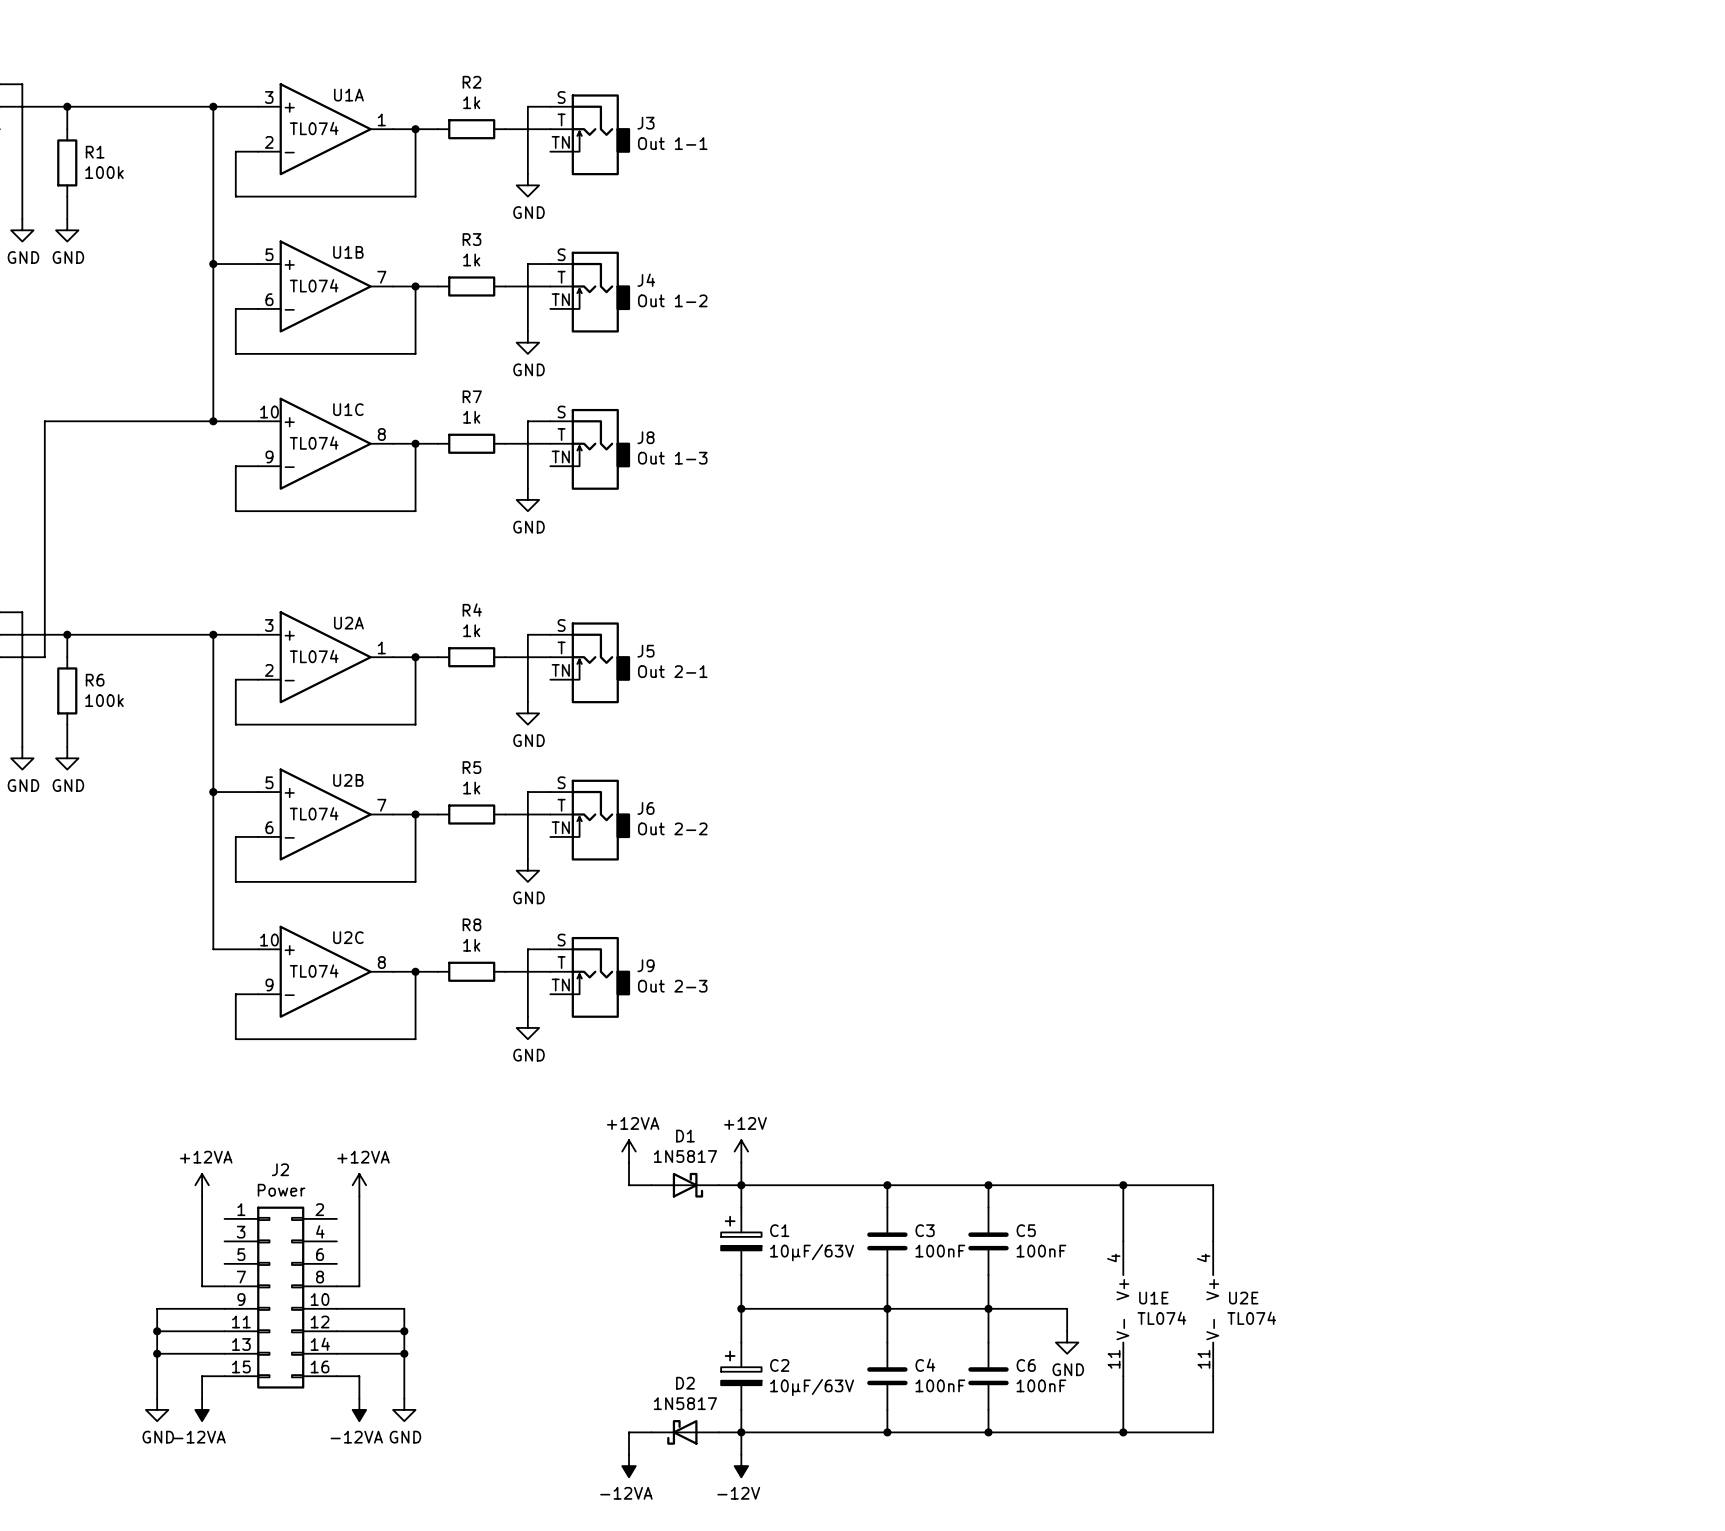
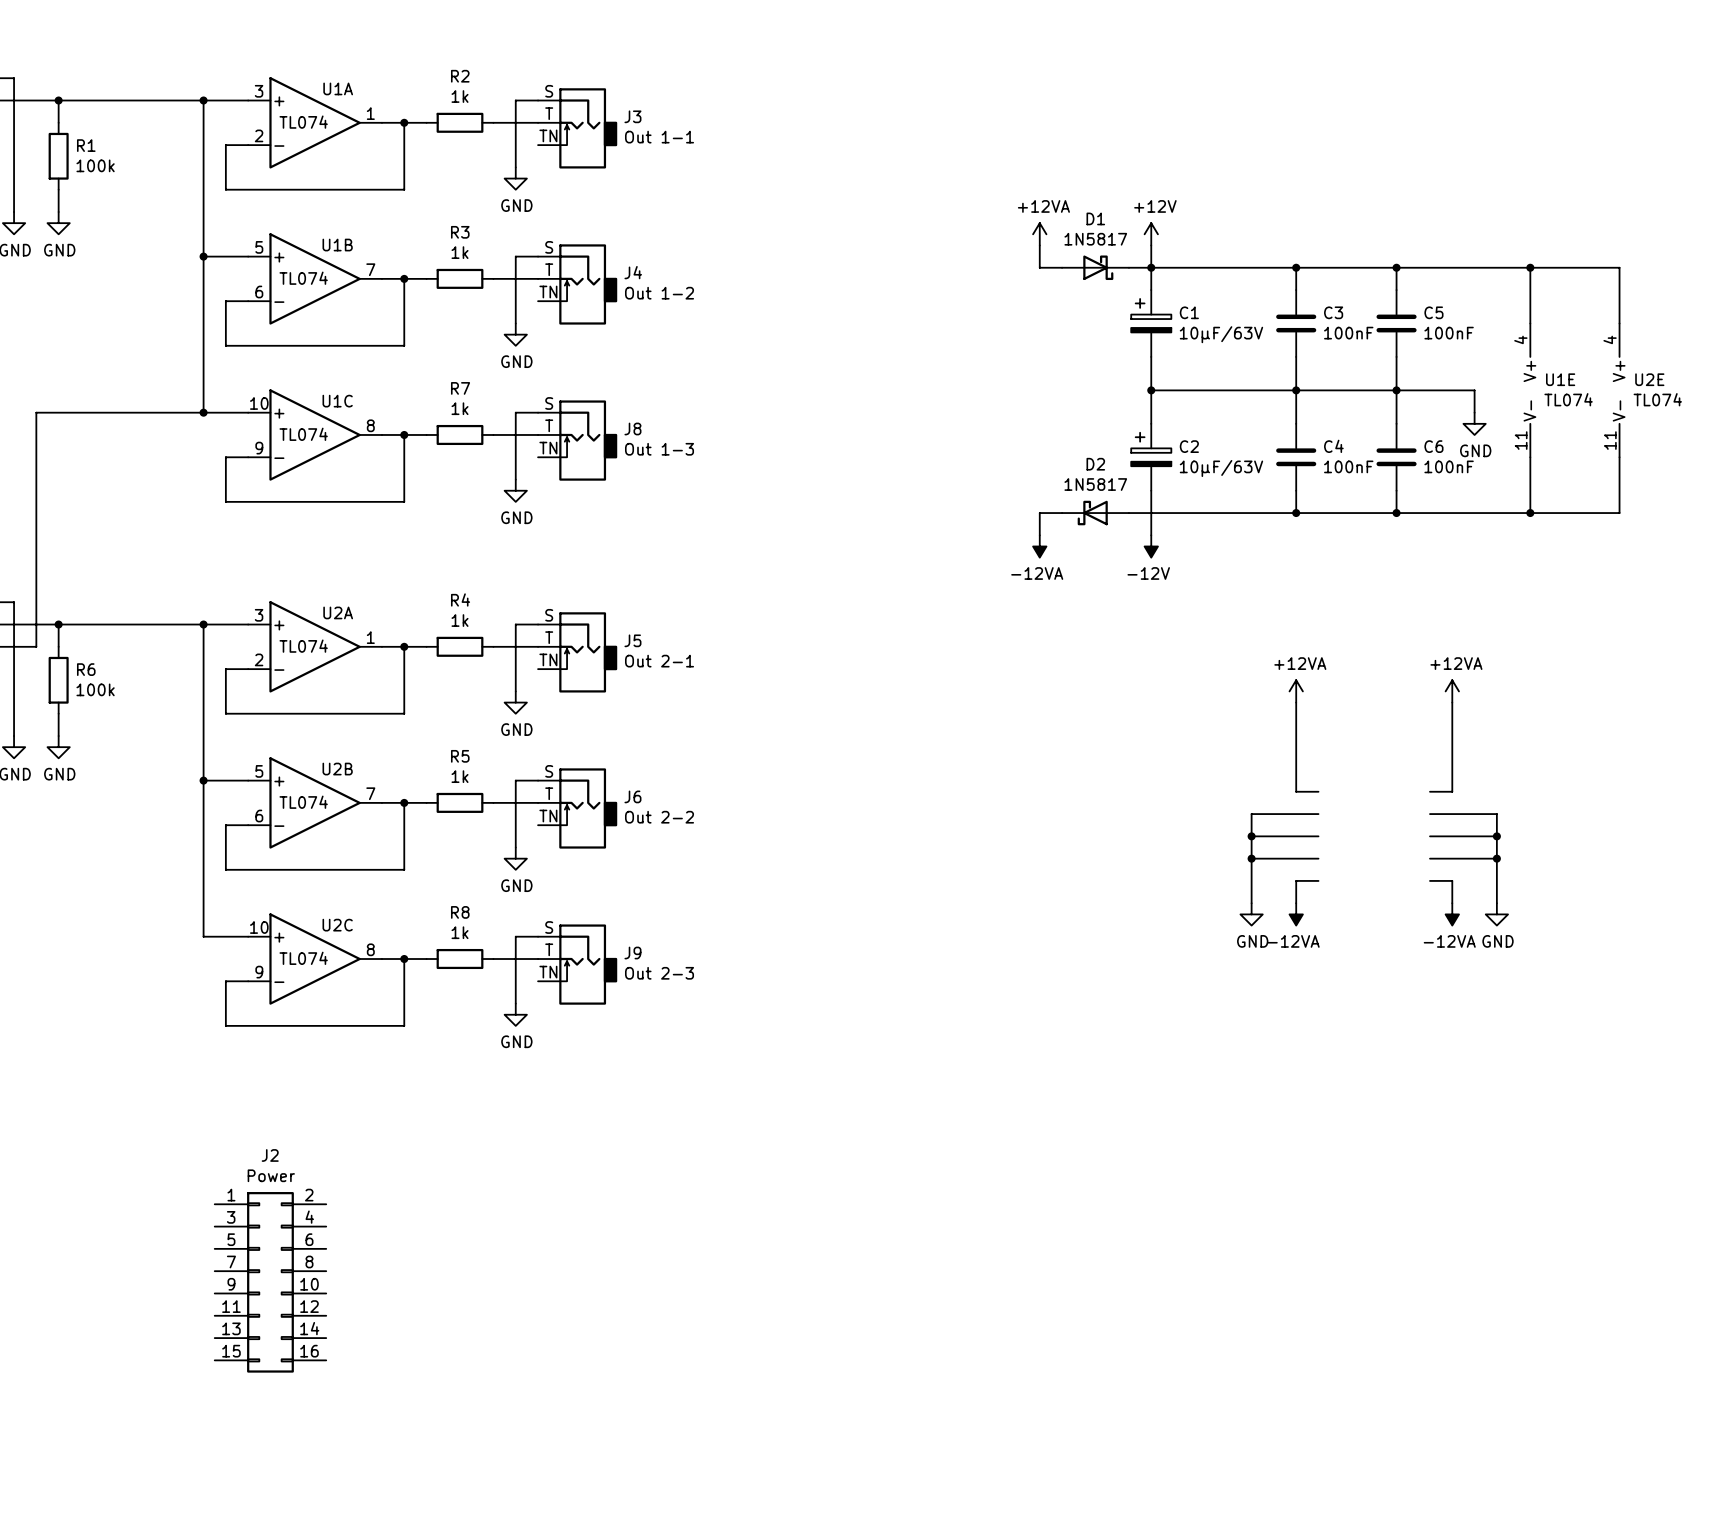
power symbol: none -> +12VA (1039, 234)
power symbol: none -> +12V (1151, 234)
wire: none -> (1039, 245) (1039, 267) (1062, 267)
wire: none -> (1151, 245) (1151, 290)
wire: none -> (1128, 267) (1619, 267) (1619, 323)
junction: none -> (1151, 267)
wire: none -> (1296, 267) (1296, 290)
junction: none -> (1296, 267)
wire: none -> (1396, 267) (1396, 290)
junction: none -> (1396, 267)
wire: none -> (1530, 267) (1530, 323)
junction: none -> (1530, 267)
wire: none -> (1151, 356) (1151, 423)
wire: none -> (1296, 356) (1296, 423)
wire: none -> (1396, 356) (1396, 423)
wire: none -> (1151, 390) (1474, 390) (1474, 412)
junction: none -> (1151, 390)
junction: none -> (1296, 390)
junction: none -> (1396, 390)
power symbol: none -> GND (1474, 423)
wire: none -> (1530, 457) (1530, 513)
wire: none -> (1619, 457) (1619, 513) (1128, 513)
wire: none -> (1151, 490) (1151, 535)
wire: none -> (1296, 490) (1296, 513)
wire: none -> (1396, 490) (1396, 513)
wire: none -> (1062, 513) (1039, 513) (1039, 535)
junction: none -> (1296, 513)
junction: none -> (1396, 513)
junction: none -> (1530, 513)
power symbol: none -> -12VA (1039, 546)
power symbol: none -> -12V (1151, 546)
power symbol: none -> +12VA (1296, 691)
power symbol: none -> +12VA (1452, 691)
wire: none -> (1296, 702) (1296, 791) (1318, 791)
wire: none -> (1452, 702) (1452, 791) (1430, 791)
wire: none -> (1318, 814) (1251, 814) (1251, 903)
wire: none -> (1430, 814) (1496, 814) (1496, 903)
wire: none -> (1251, 836) (1318, 836)
junction: none -> (1251, 836)
wire: none -> (1430, 836) (1496, 836)
junction: none -> (1496, 836)
wire: none -> (1251, 858) (1318, 858)
junction: none -> (1251, 858)
wire: none -> (1430, 858) (1496, 858)
junction: none -> (1496, 858)
wire: none -> (1318, 880) (1296, 880) (1296, 903)
wire: none -> (1430, 880) (1452, 880) (1452, 903)
power symbol: none -> GND (1251, 914)
power symbol: none -> -12VA (1296, 914)
power symbol: none -> -12VA (1452, 914)
power symbol: none -> GND (1496, 914)
power symbol: +12VA (629, 1151) -> none
power symbol: +12V (741, 1151) -> none
wire: (629, 1162) (629, 1185) (651, 1185) -> none
wire: (741, 1162) (741, 1207) -> none
power symbol: +12VA (202, 1185) -> none
power symbol: +12VA (359, 1185) -> none
D1 position: (685, 1185) -> (1095, 267)
wire: (718, 1185) (1213, 1185) (1213, 1241) -> none
junction: (741, 1185) -> none
wire: (887, 1185) (887, 1207) -> none
junction: (887, 1185) -> none
wire: (988, 1185) (988, 1207) -> none
junction: (988, 1185) -> none
wire: (1123, 1185) (1123, 1241) -> none
junction: (1123, 1185) -> none
wire: (202, 1196) (202, 1286) (224, 1286) -> none
wire: (359, 1196) (359, 1286) (336, 1286) -> none
C1 position: (741, 1241) -> (1151, 323)
C3 position: (887, 1241) -> (1296, 323)
C5 position: (988, 1241) -> (1396, 323)
wire: (741, 1275) (741, 1342) -> none
wire: (887, 1275) (887, 1342) -> none
wire: (988, 1275) (988, 1342) -> none
wire: (224, 1308) (157, 1308) (157, 1398) -> none
wire: (336, 1308) (404, 1308) (404, 1398) -> none
wire: (741, 1308) (1067, 1308) (1067, 1331) -> none
junction: (741, 1308) -> none
junction: (887, 1308) -> none
junction: (988, 1308) -> none
U1E position: (1123, 1308) -> (1530, 390)
U2E position: (1213, 1308) -> (1619, 390)
wire: (157, 1331) (224, 1331) -> none
junction: (157, 1331) -> none
wire: (336, 1331) (404, 1331) -> none
junction: (404, 1331) -> none
power symbol: GND (1067, 1342) -> none
wire: (157, 1353) (224, 1353) -> none
junction: (157, 1353) -> none
wire: (336, 1353) (404, 1353) -> none
junction: (404, 1353) -> none
wire: (224, 1376) (202, 1376) (202, 1398) -> none
wire: (336, 1376) (359, 1376) (359, 1398) -> none
C2 position: (741, 1376) -> (1151, 457)
C4 position: (887, 1376) -> (1296, 457)
C6 position: (988, 1376) -> (1396, 457)
wire: (1123, 1376) (1123, 1432) -> none
wire: (1213, 1376) (1213, 1432) (718, 1432) -> none
power symbol: GND (157, 1409) -> none
power symbol: -12VA (202, 1409) -> none
power symbol: -12VA (359, 1409) -> none
power symbol: GND (404, 1409) -> none
wire: (741, 1409) (741, 1454) -> none
wire: (887, 1409) (887, 1432) -> none
wire: (988, 1409) (988, 1432) -> none
wire: (651, 1432) (629, 1432) (629, 1454) -> none
D2 position: (685, 1432) -> (1095, 513)
junction: (741, 1432) -> none
junction: (887, 1432) -> none
junction: (988, 1432) -> none
junction: (1123, 1432) -> none
power symbol: -12VA (629, 1466) -> none
power symbol: -12V (741, 1466) -> none

